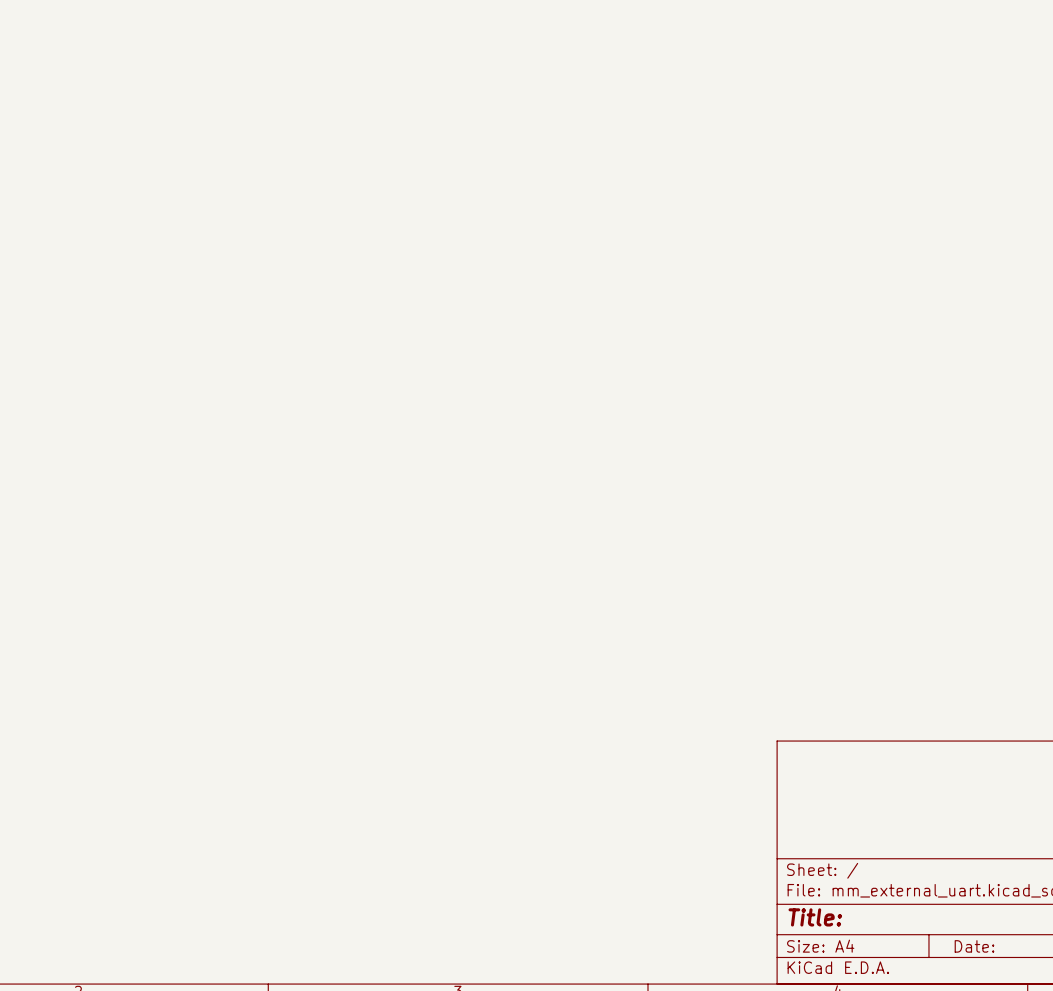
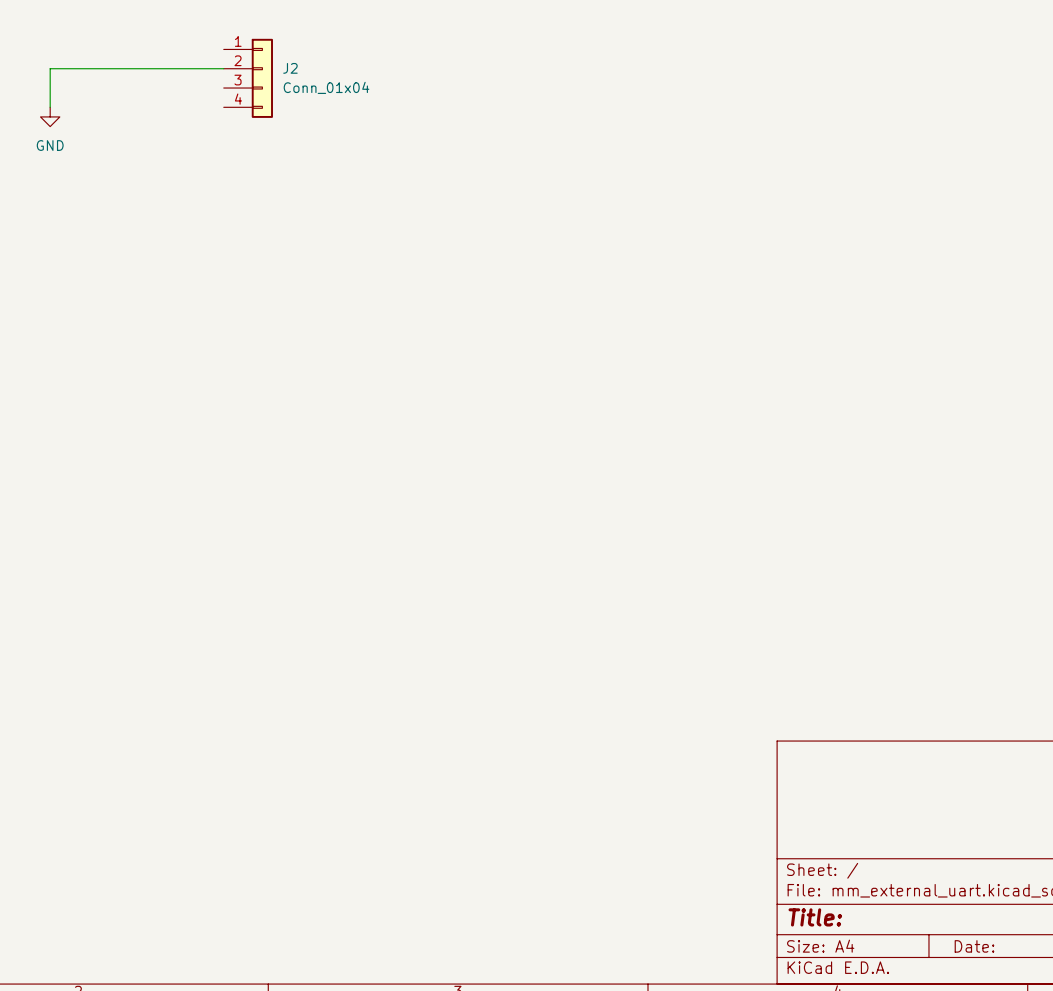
wire: none -> (223, 68) (50, 68) (50, 107)
J2: none -> Conn_01x04 (248, 78)
power symbol: none -> GND (50, 116)

